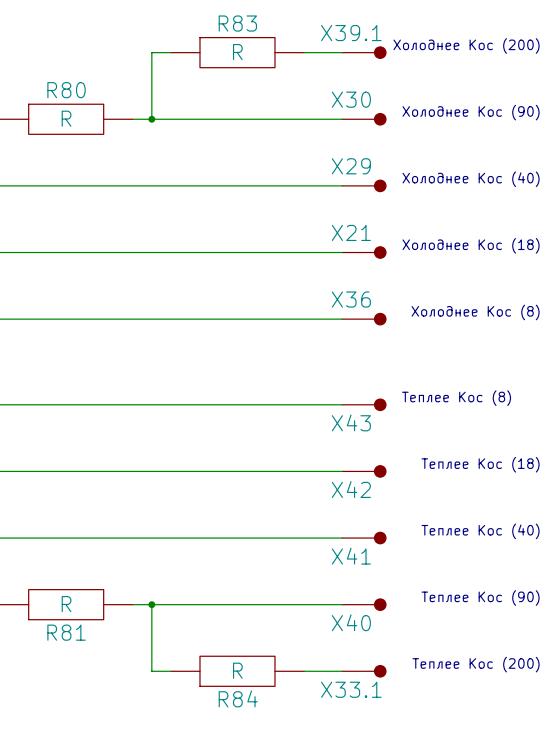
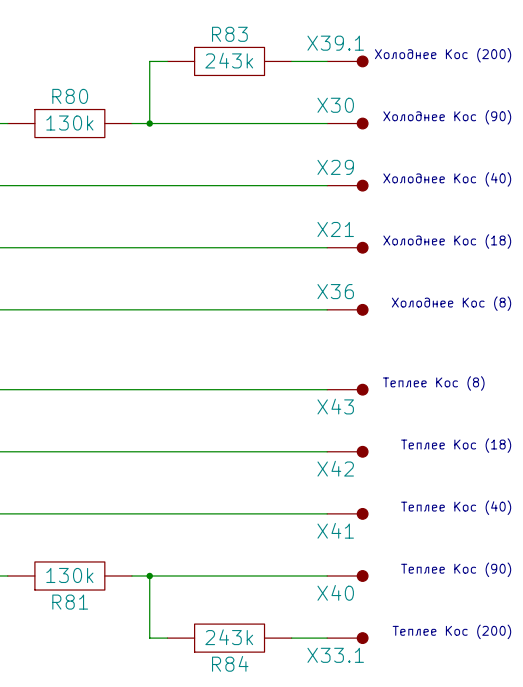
R83 value: R (237, 52) -> 243k (229, 60)
R80 value: R (66, 118) -> 130k (69, 123)
R81 value: R (66, 604) -> 130k (69, 575)
R84 value: R (237, 670) -> 243k (229, 637)

